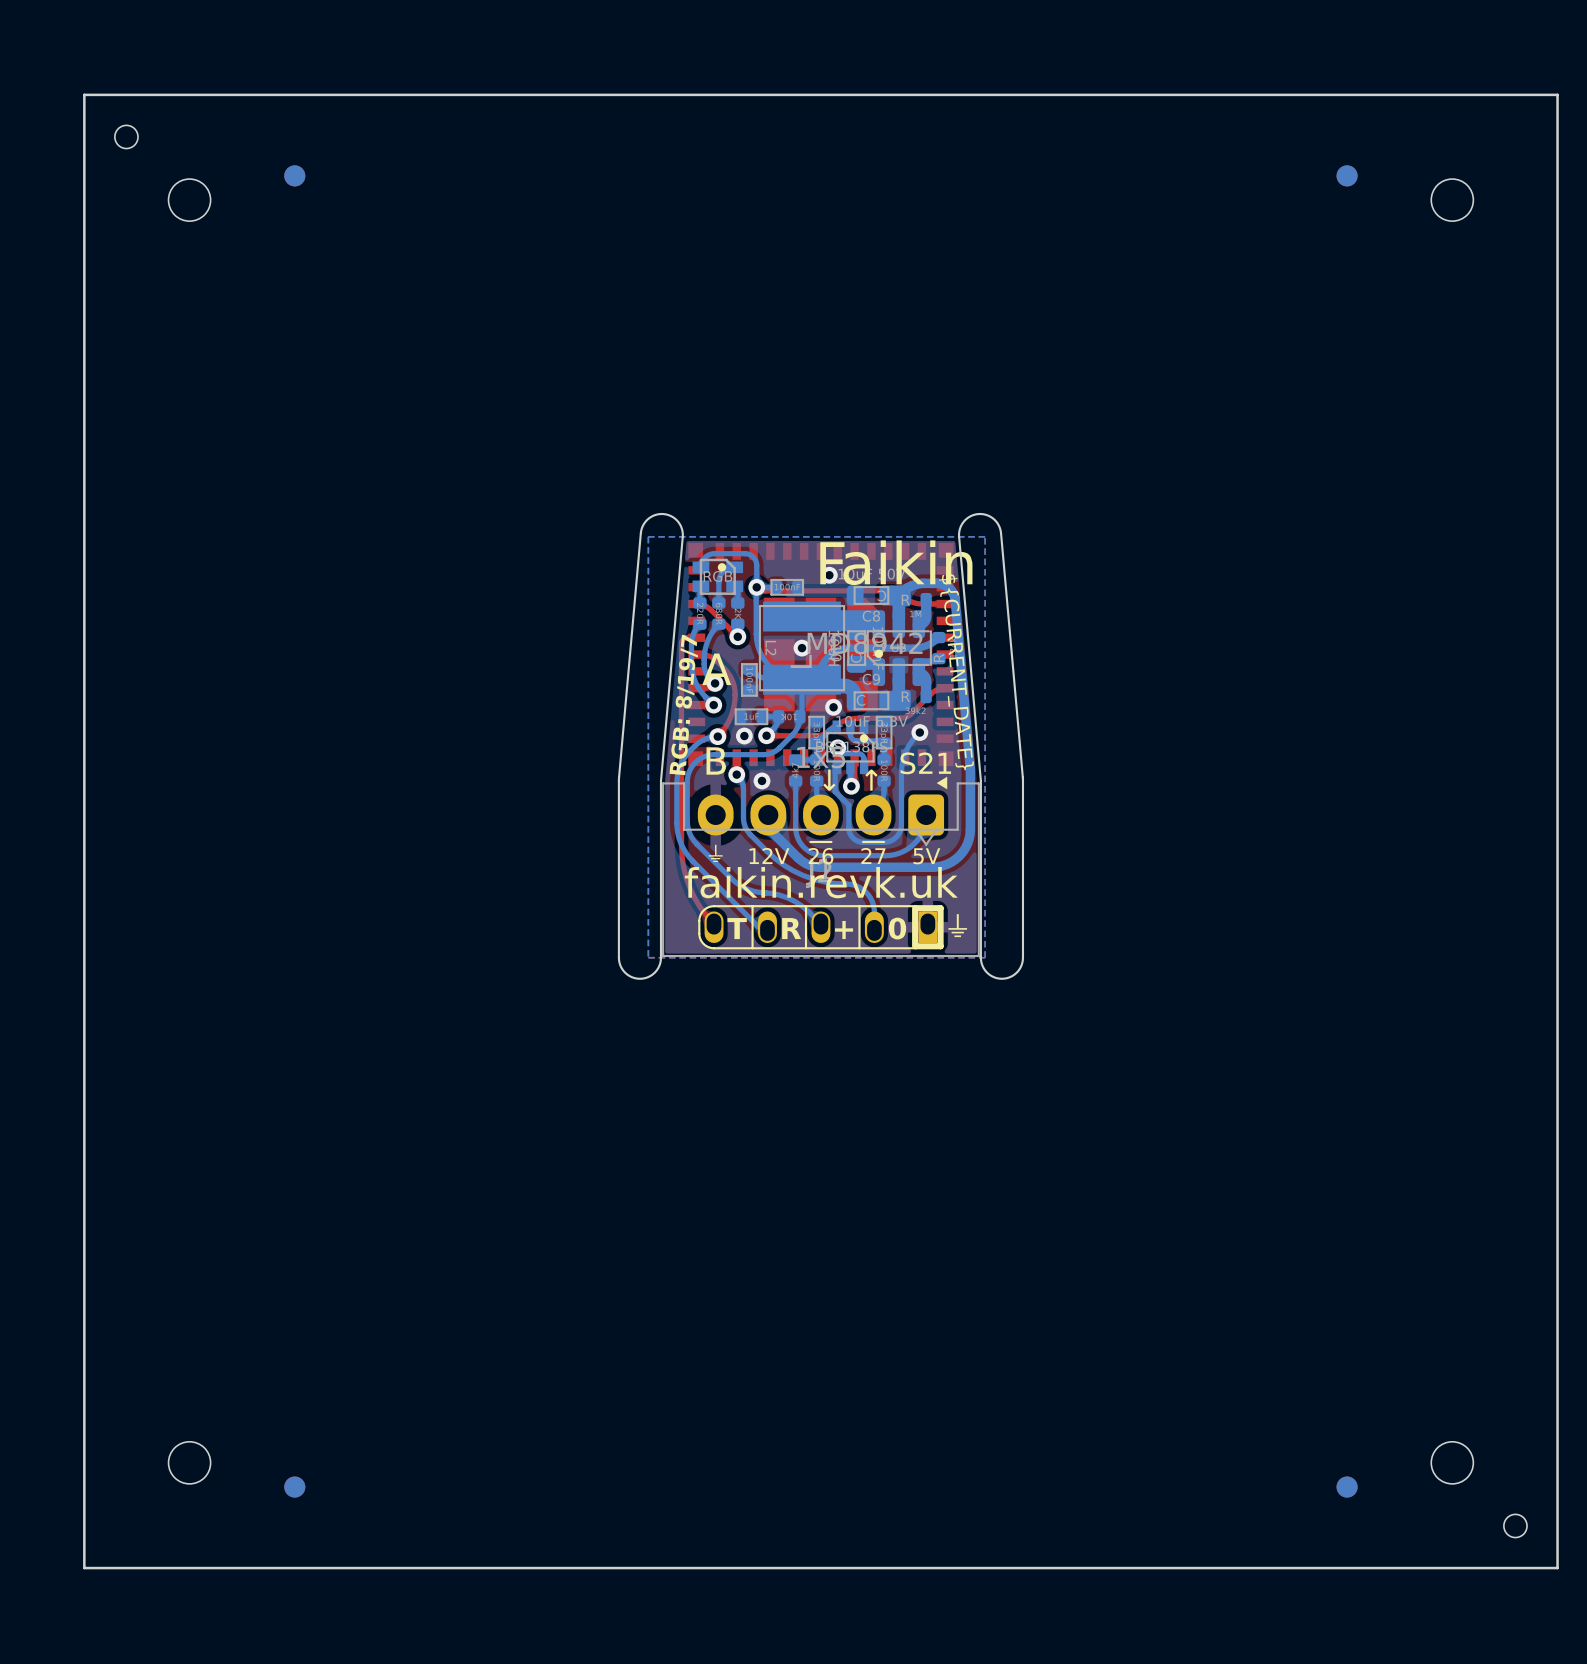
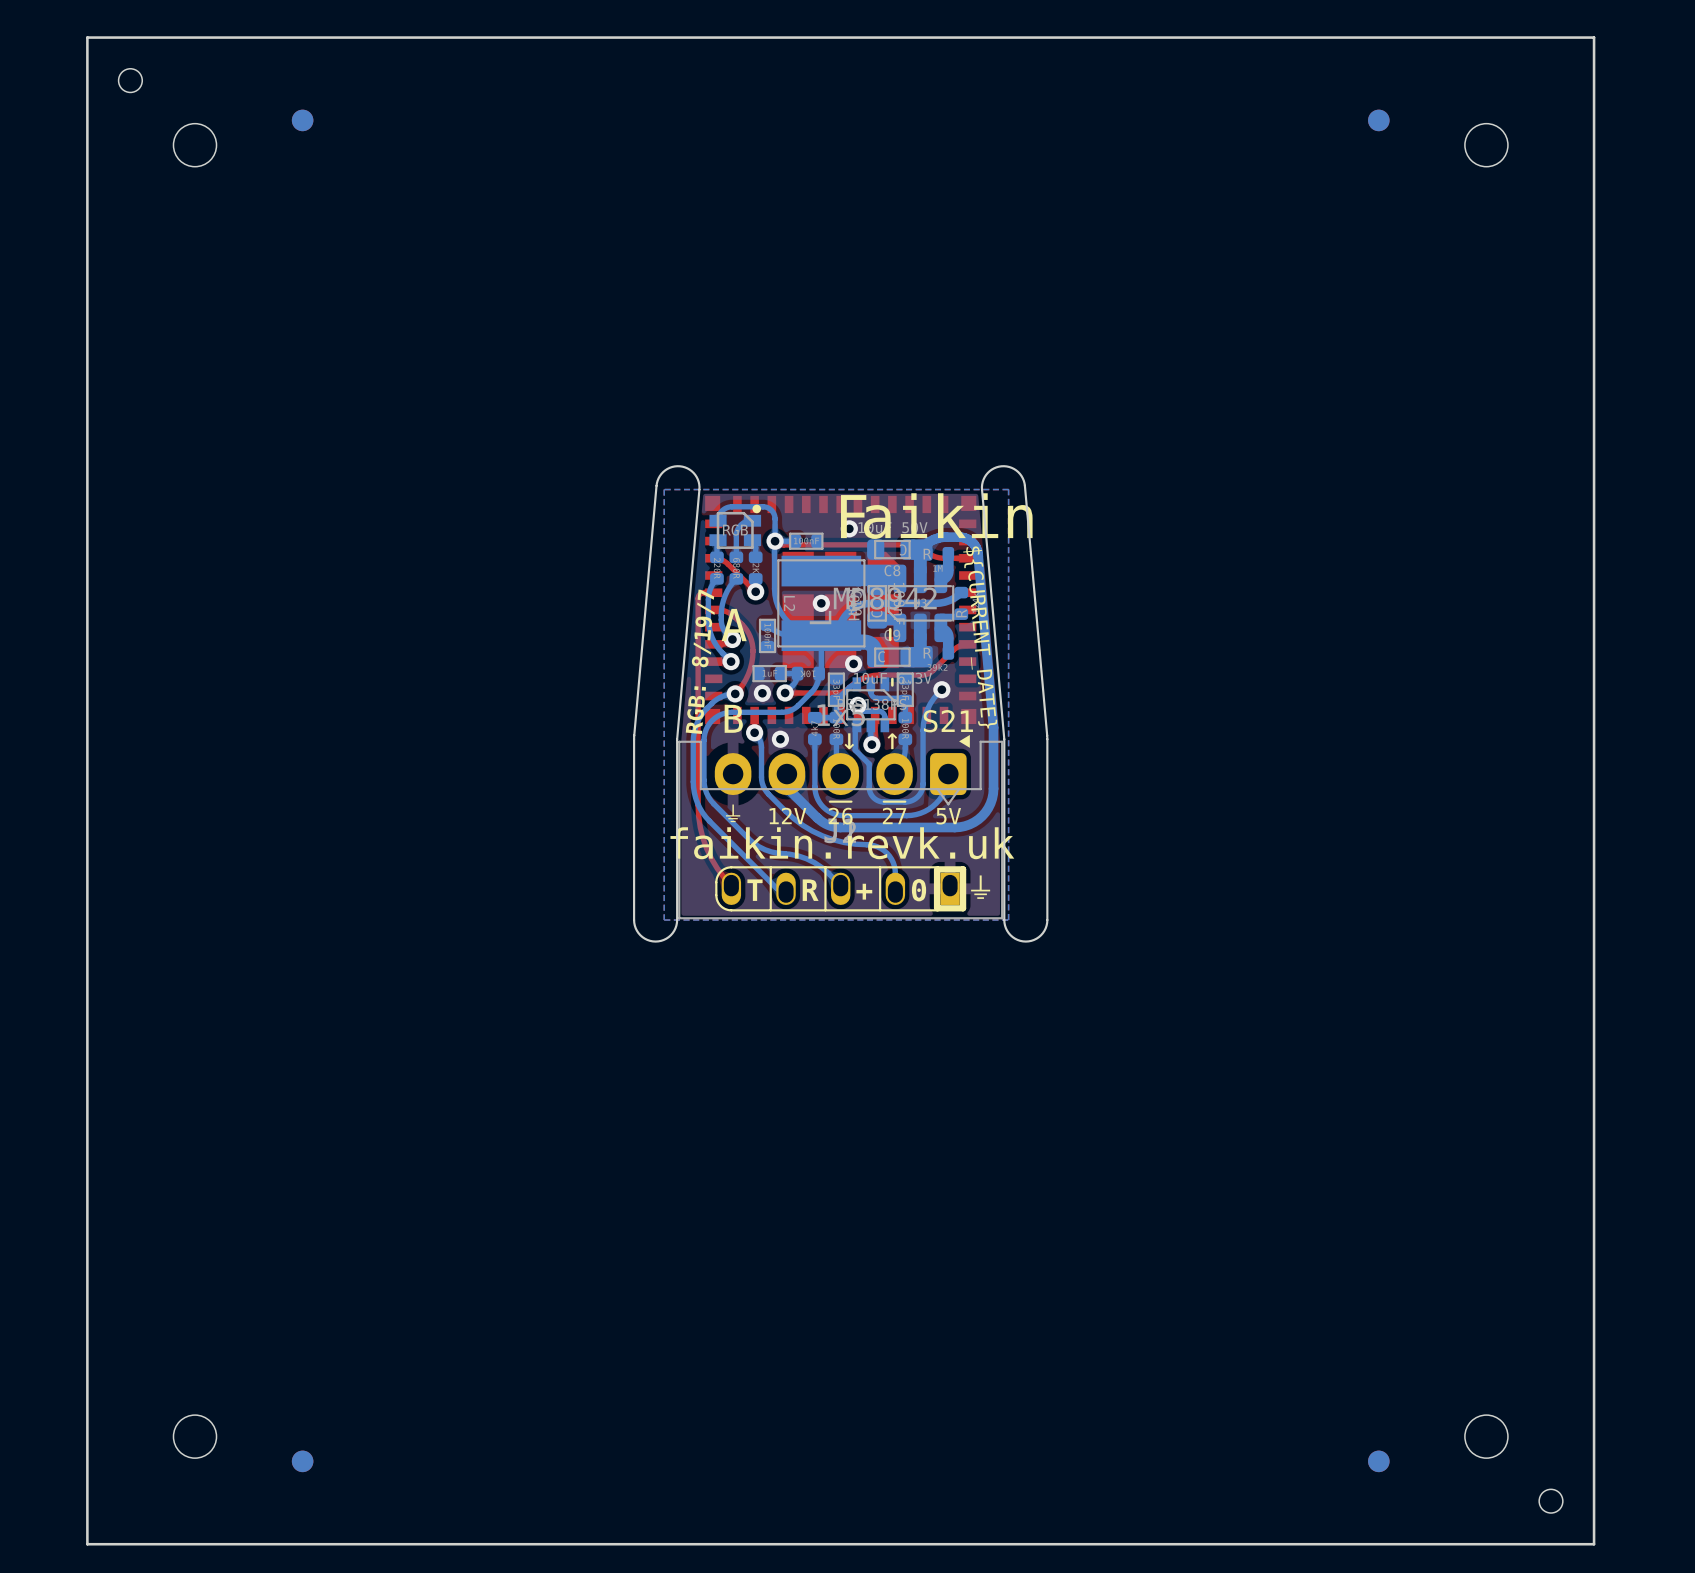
part footprint: [692, 558, 744, 595] -> [709, 504, 762, 549]
part footprint: [763, 585, 946, 711] -> [781, 539, 969, 668]
part footprint: [826, 720, 875, 775] -> [846, 677, 896, 733]

